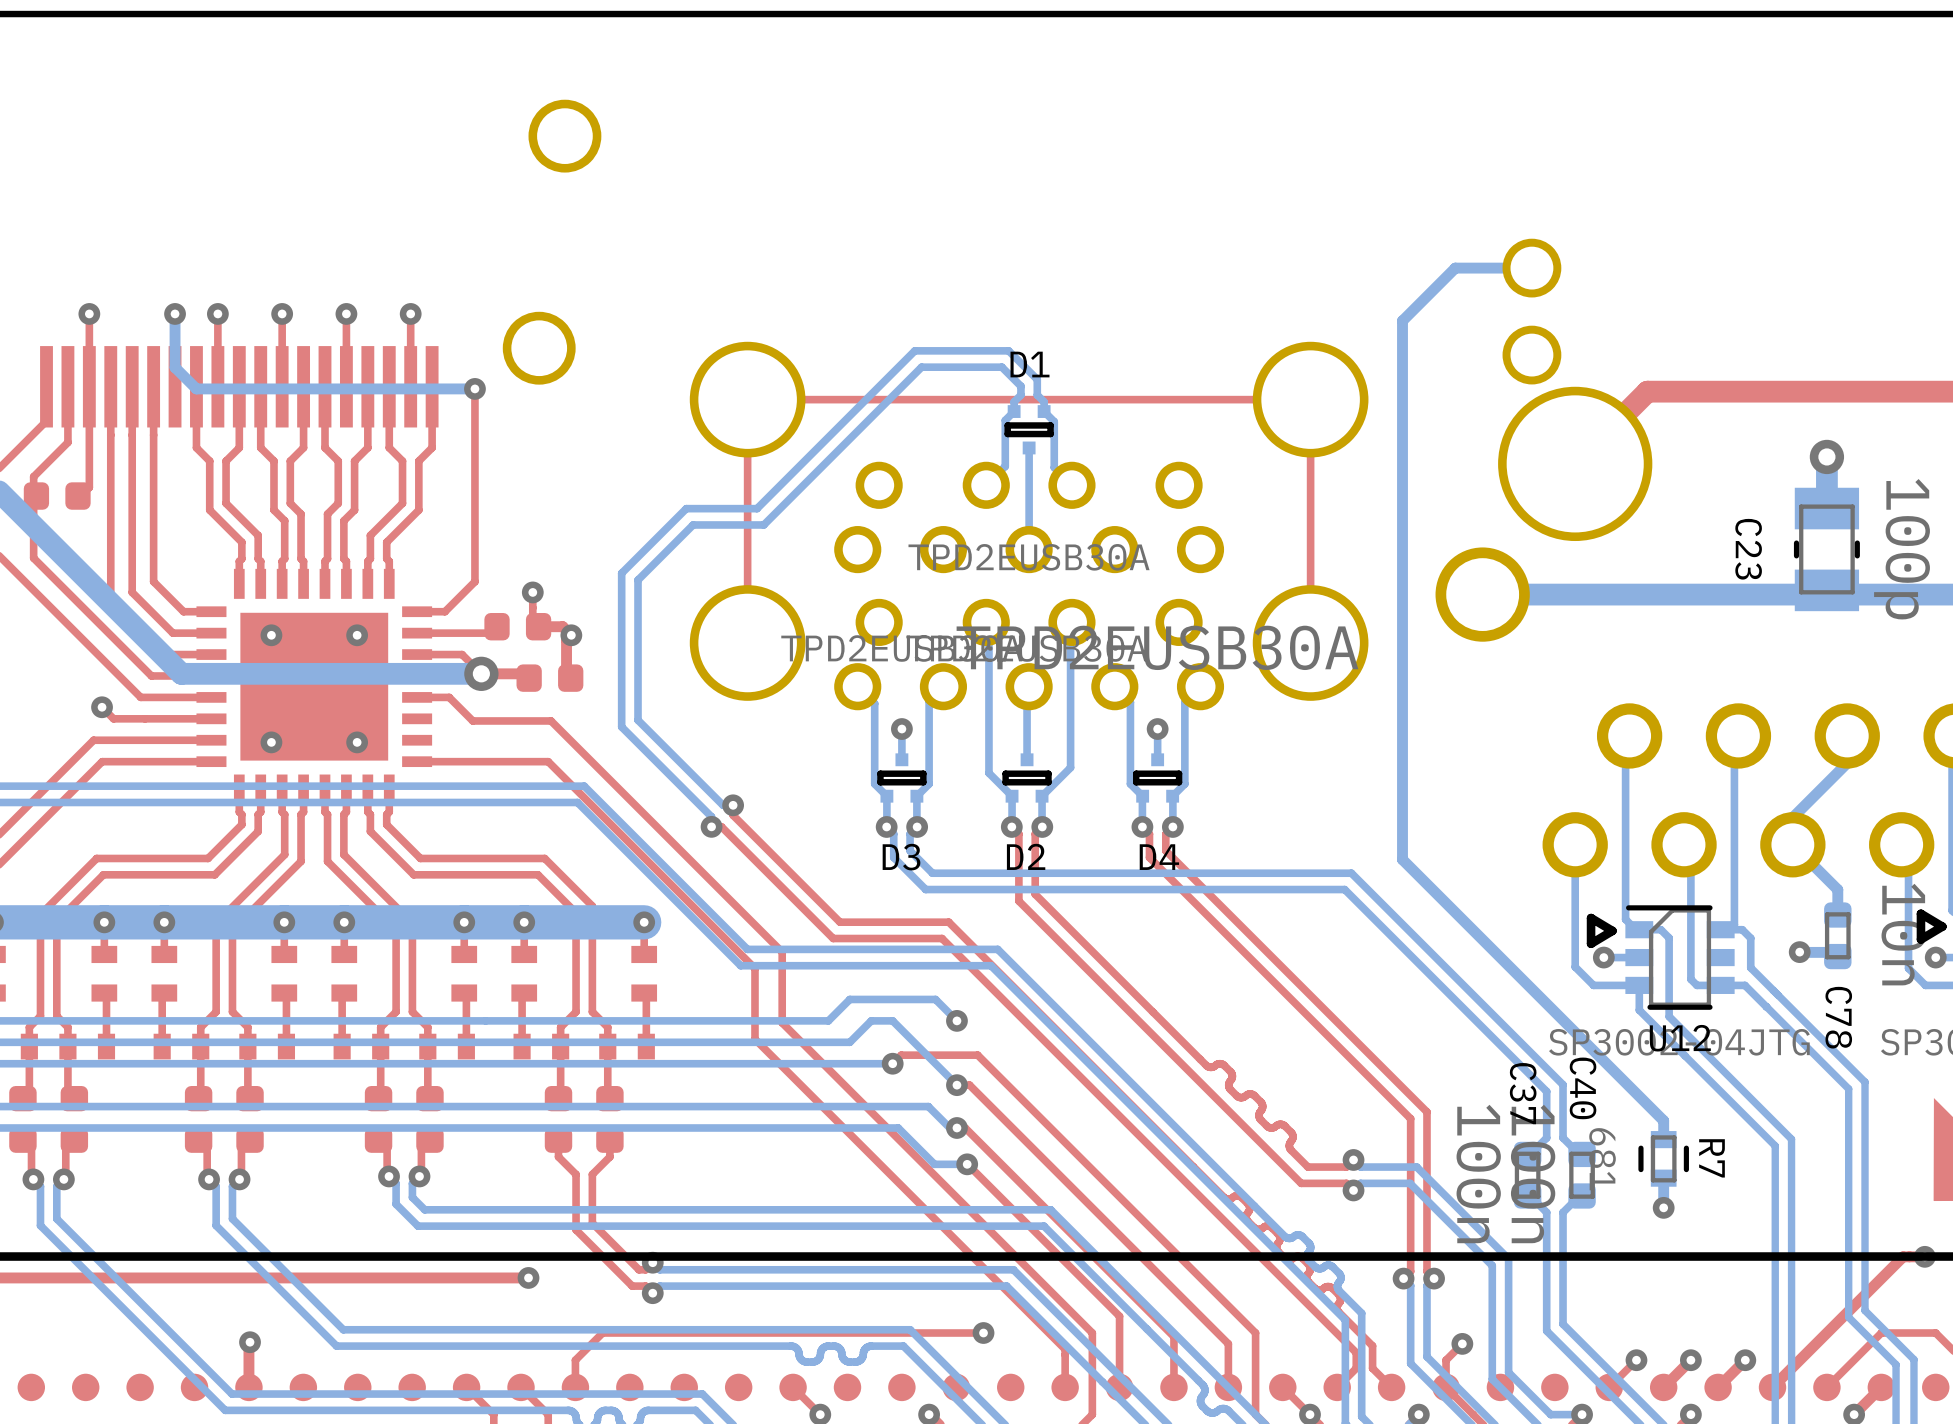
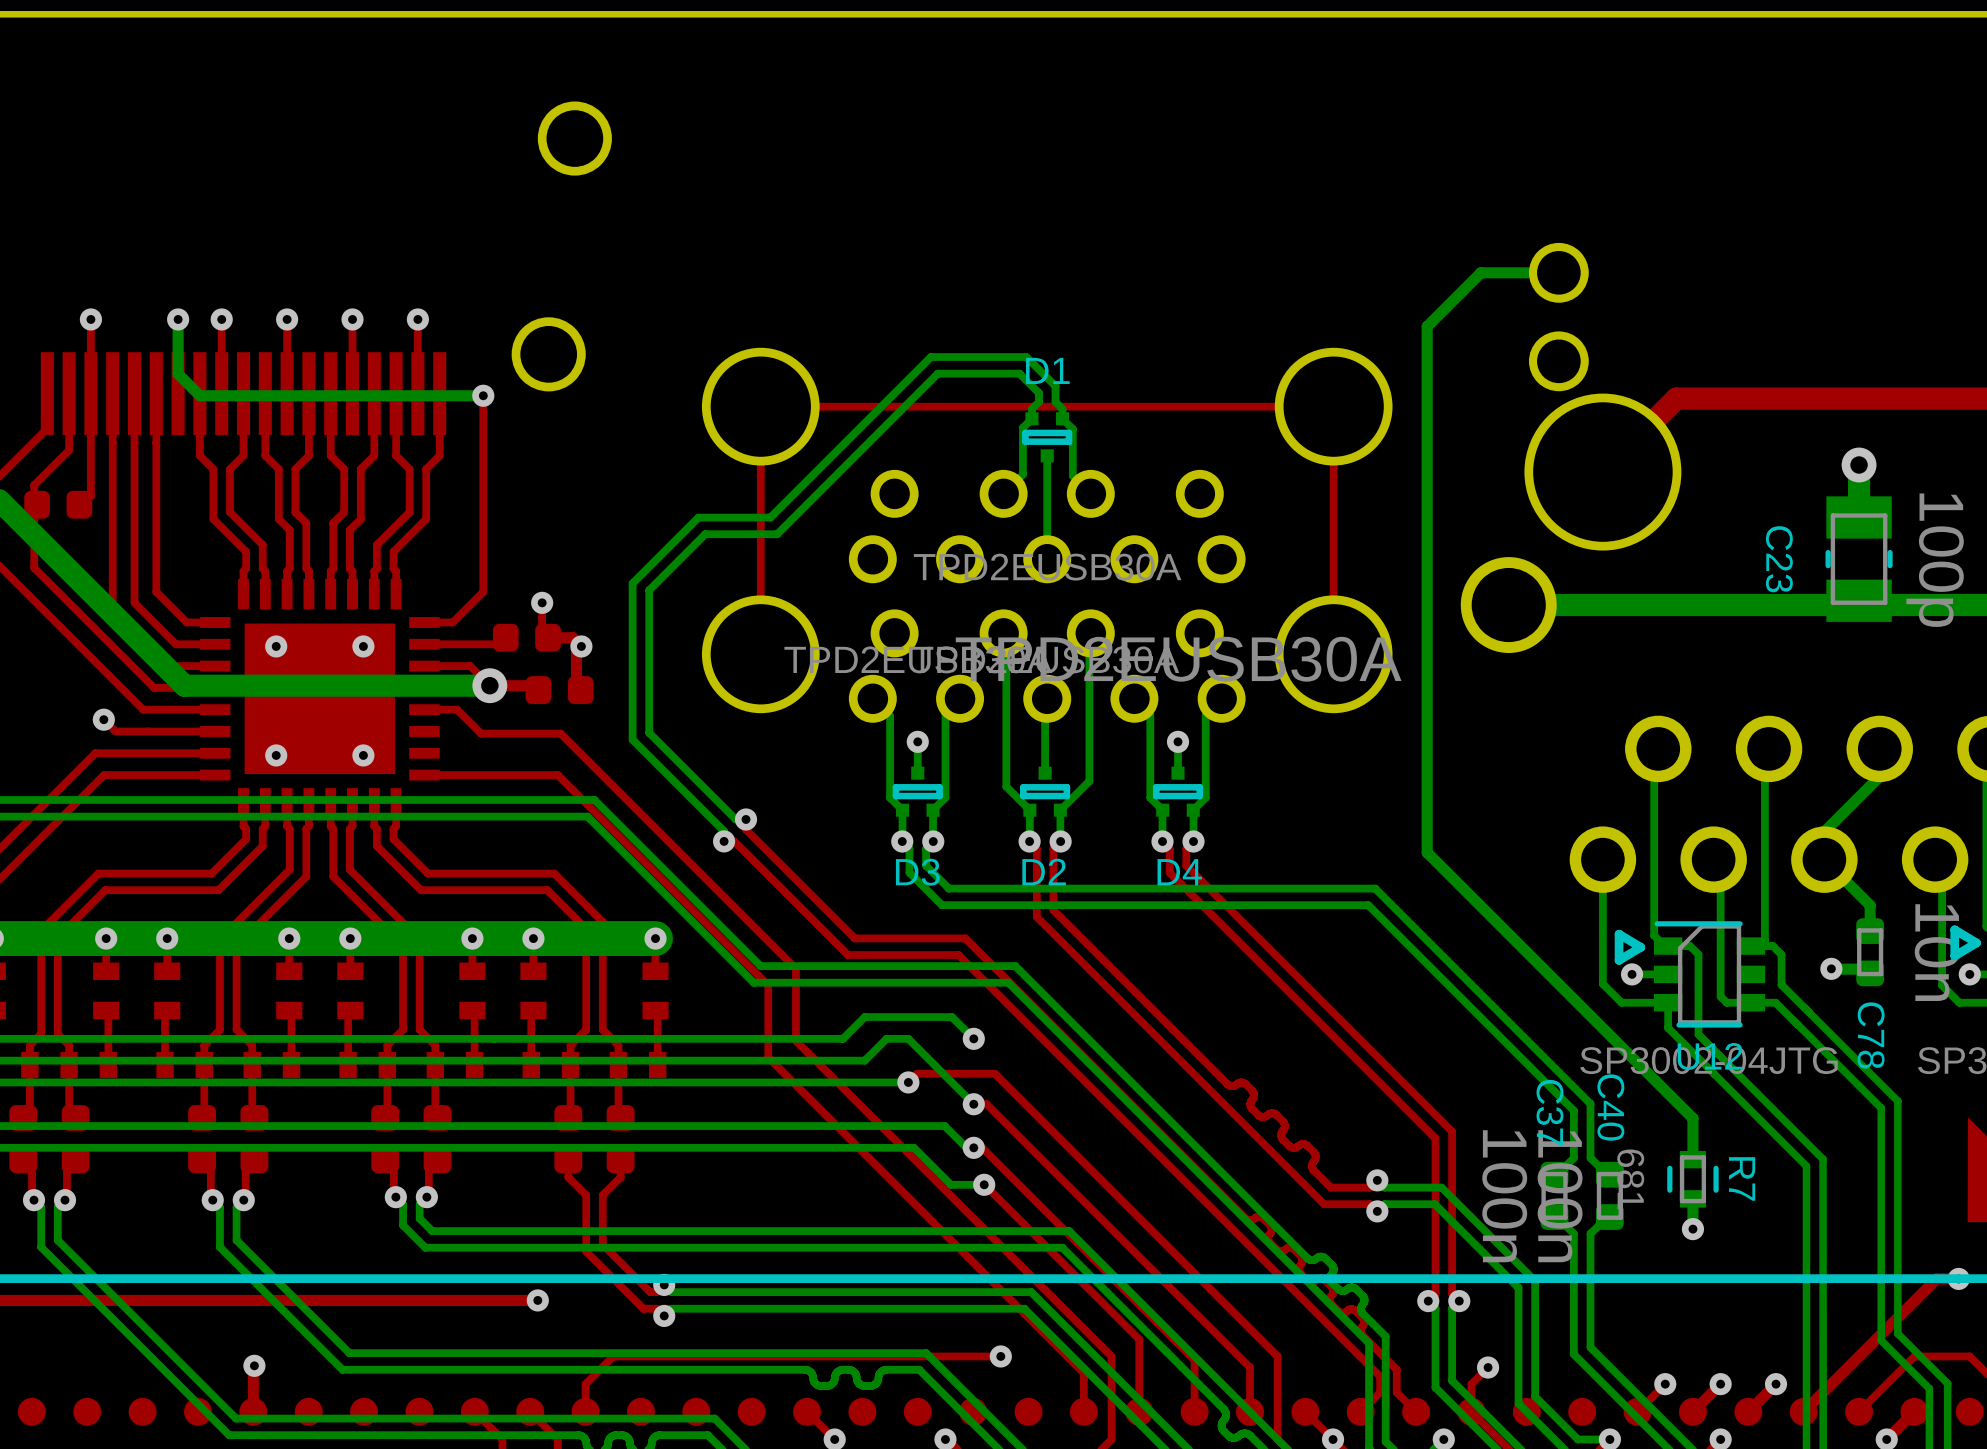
bottom track: (1402, 837) (1402, 859) (1663, 1120) -> (1427, 852) (1692, 1118) (1692, 1140)

